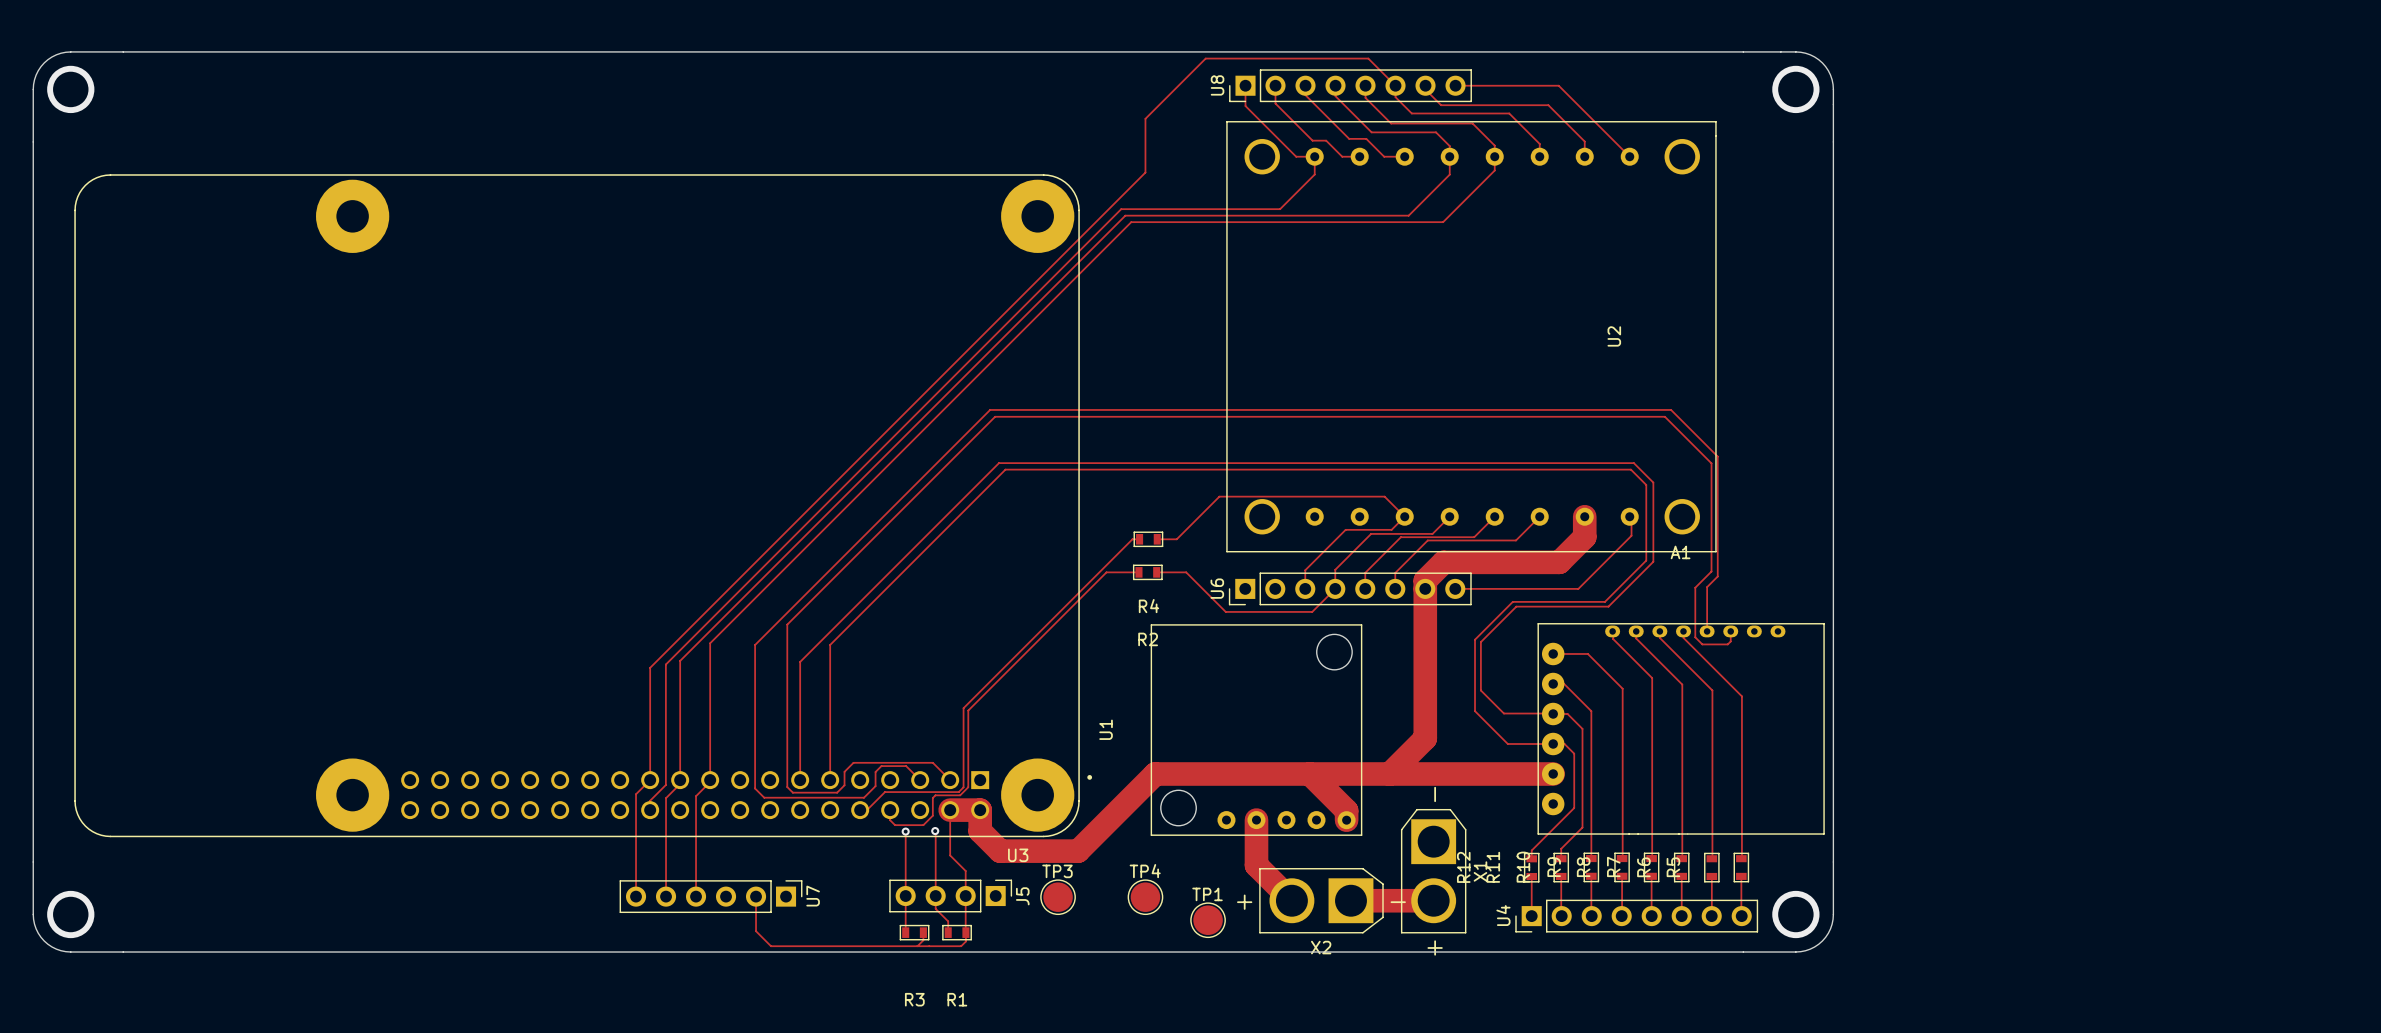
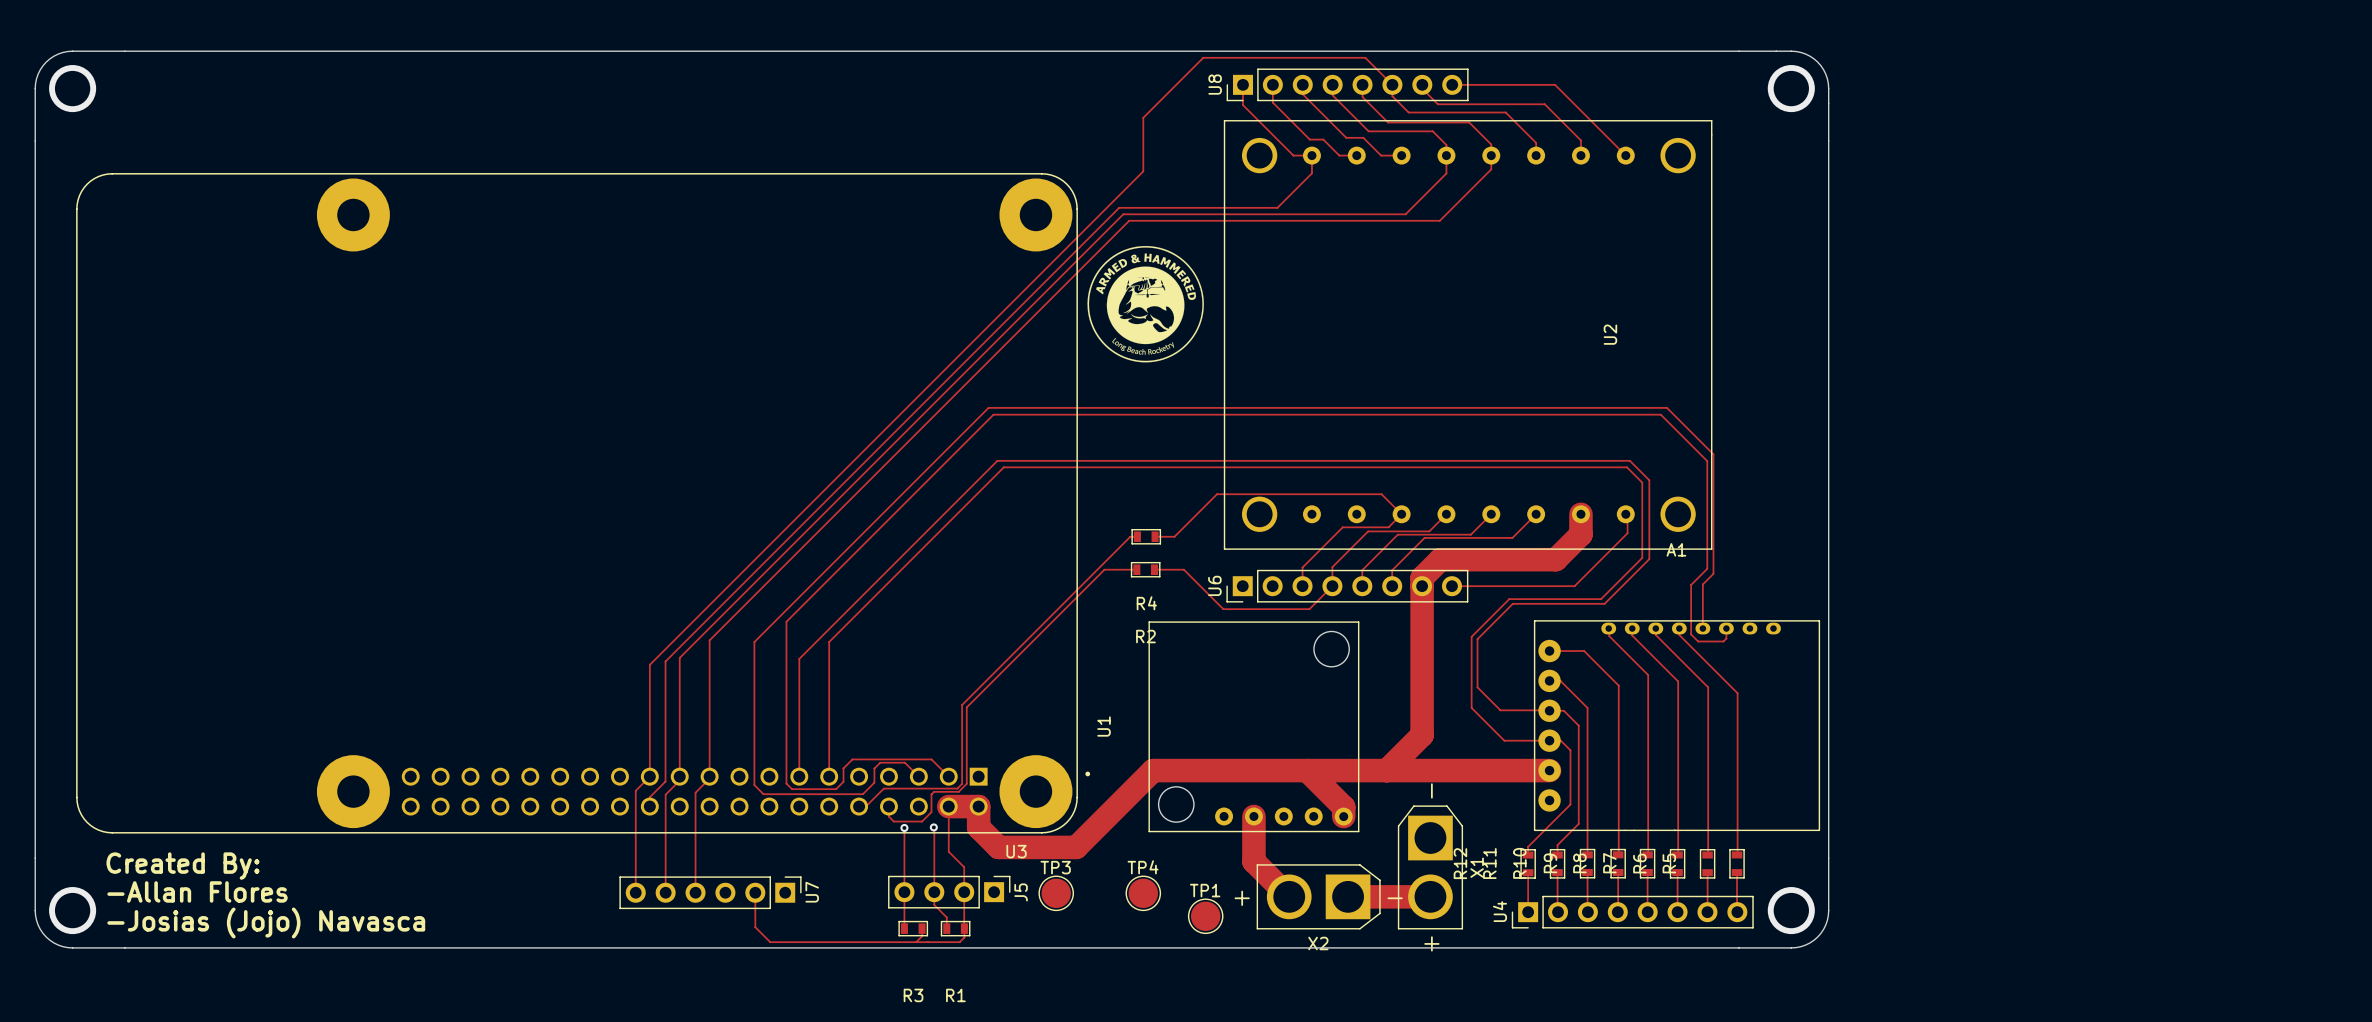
drawing: none -> [1087, 246, 1204, 363]
text: none -> Created By: (182, 866)
text: none -> -Allan Flores (197, 891)
text: none -> -Josias (Jojo) Navasca (266, 922)

